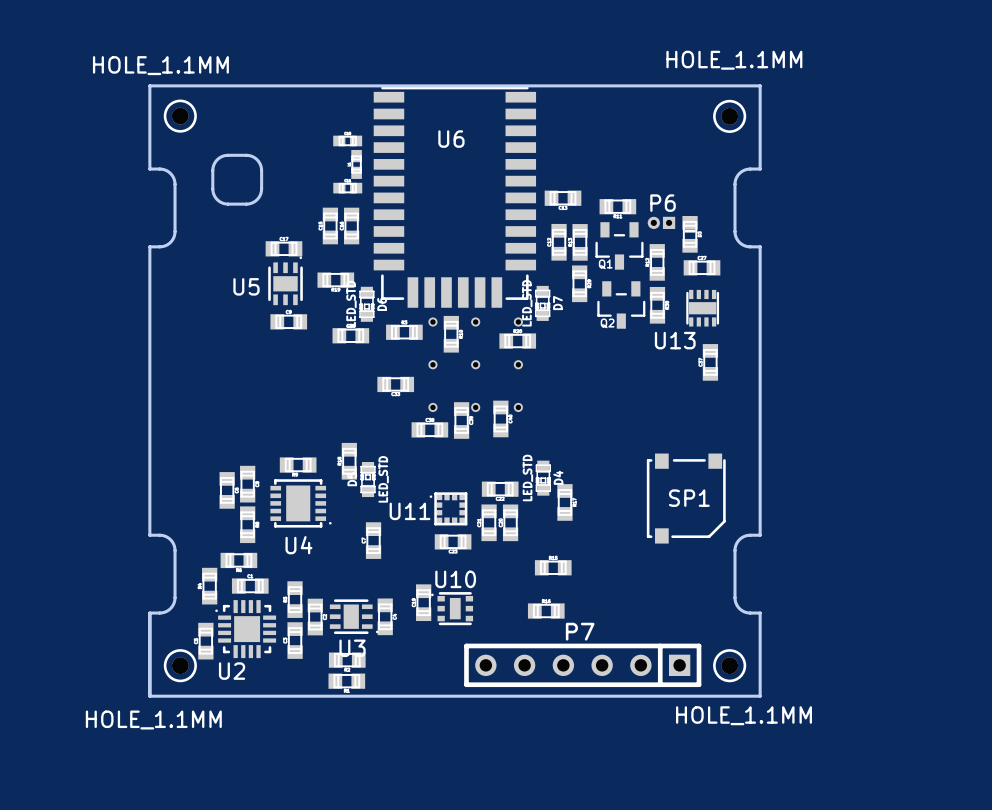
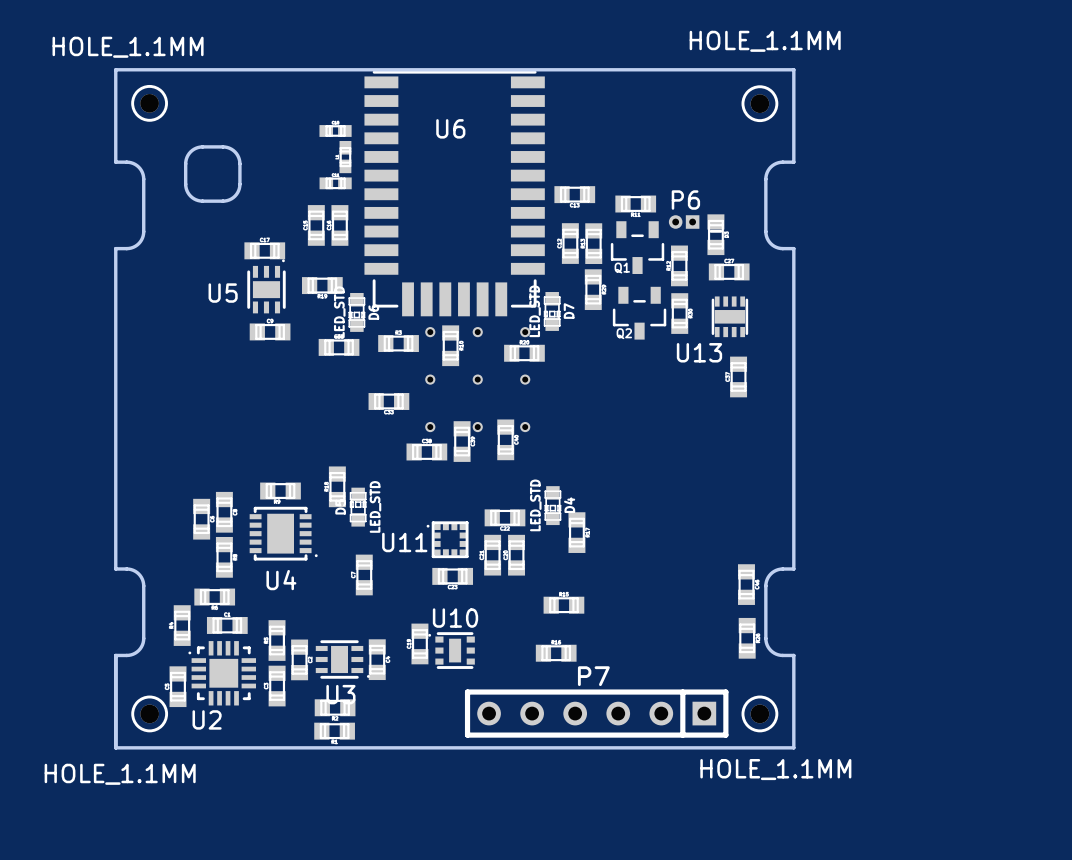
SP1: (686, 498) -> none
part: none -> (746, 584)
part: none -> (747, 638)

